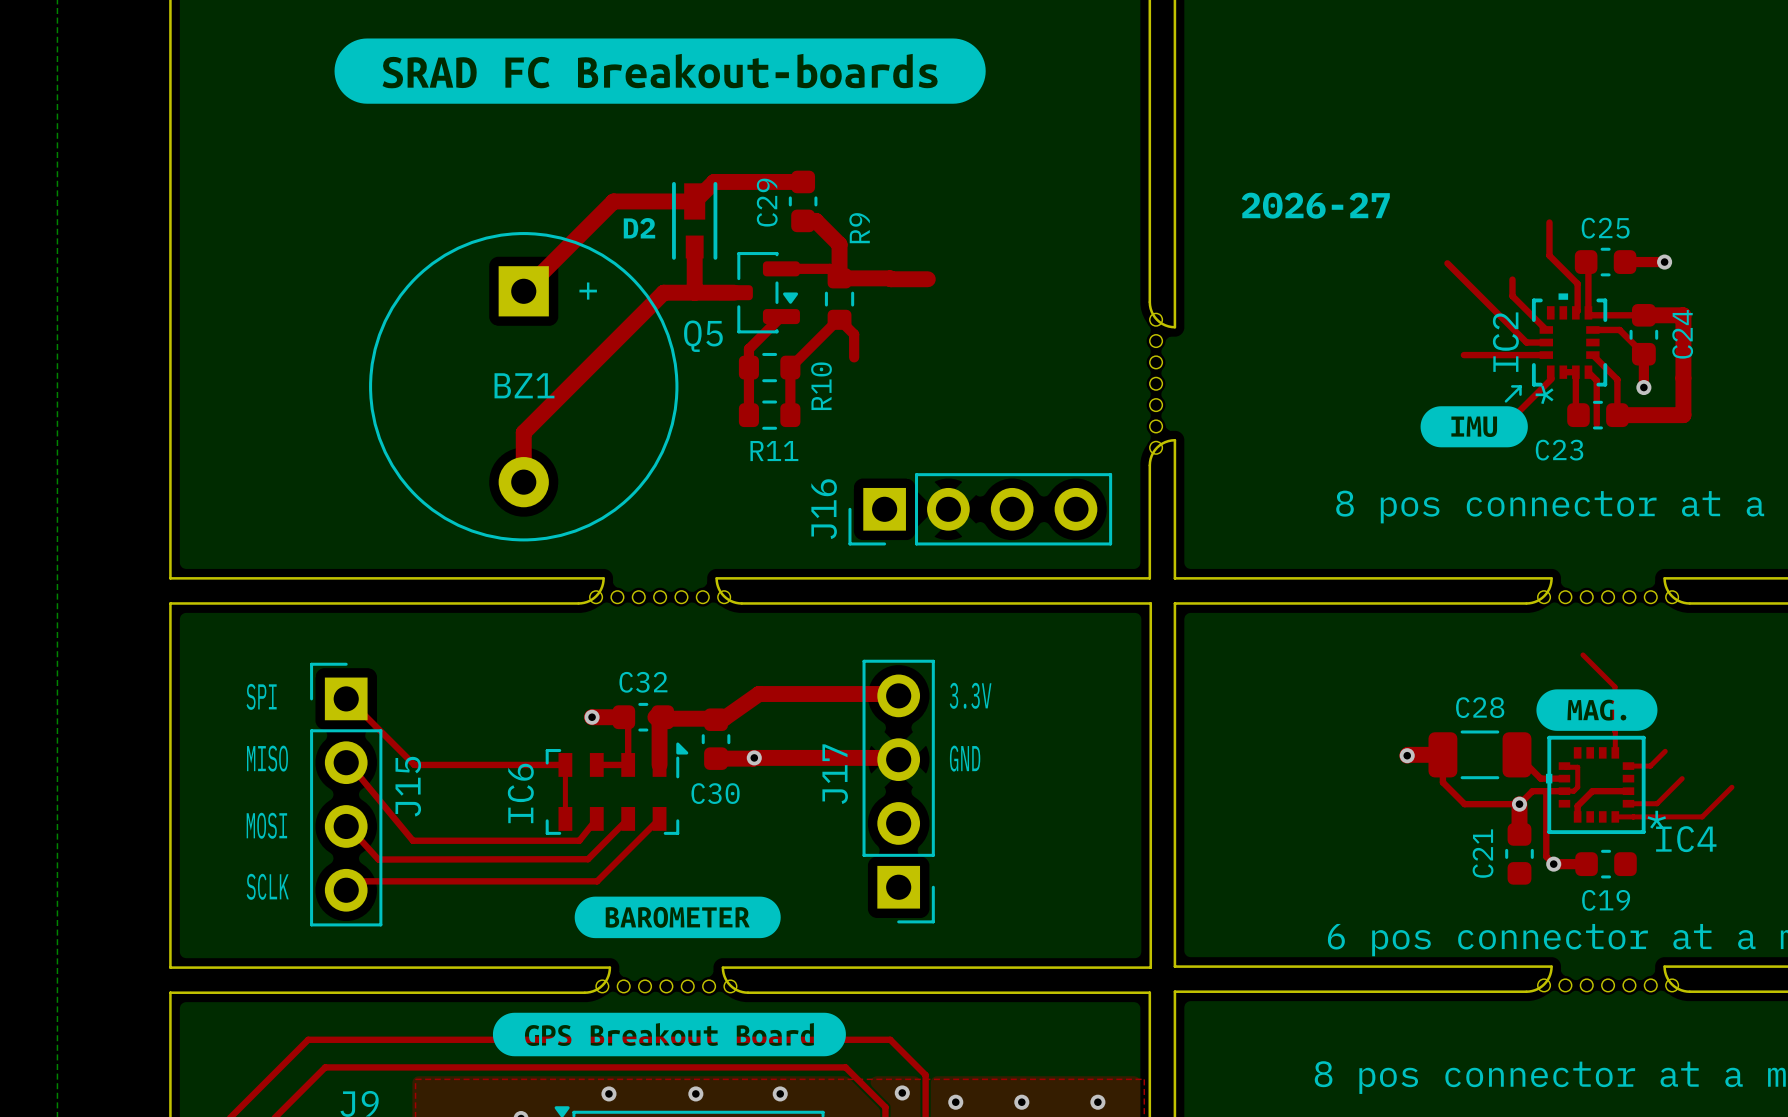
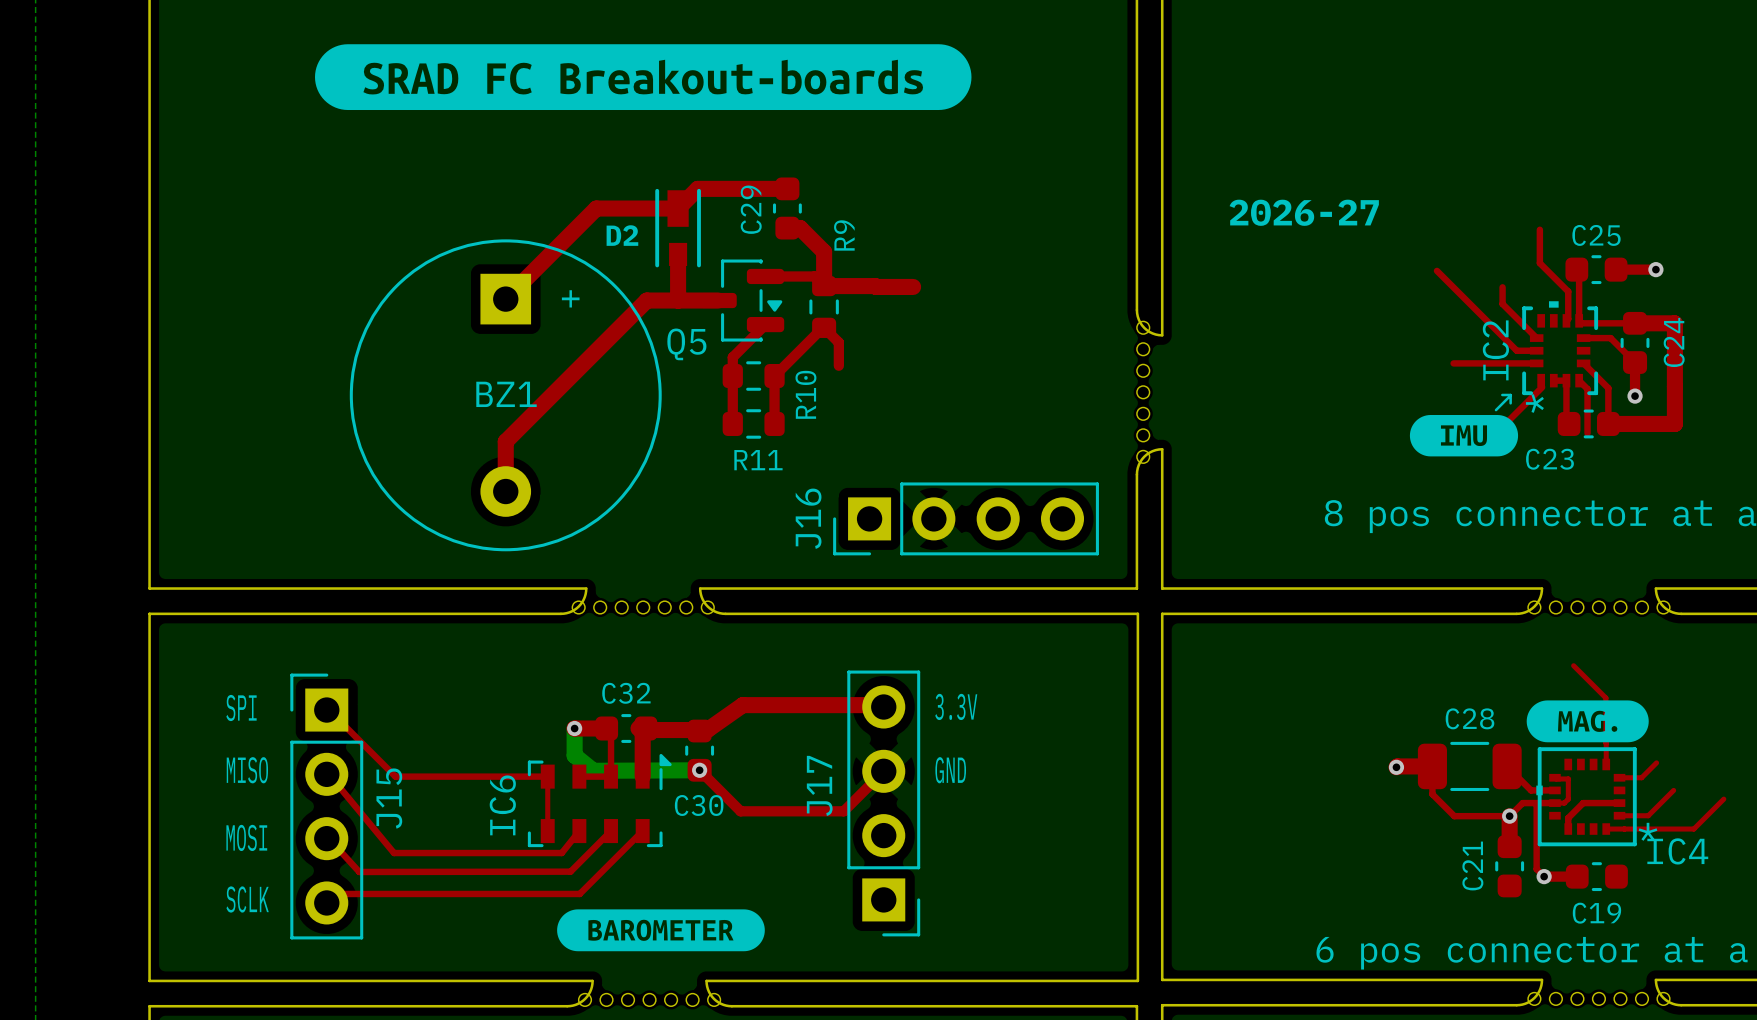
bottom track: none -> (574, 728) (574, 755) (593, 770) (699, 770) (698, 771)
via position: (754, 757) -> (699, 770)
top track: (716, 758) (896, 757) (898, 759) -> (699, 770) (740, 811) (843, 811) (883, 771)

